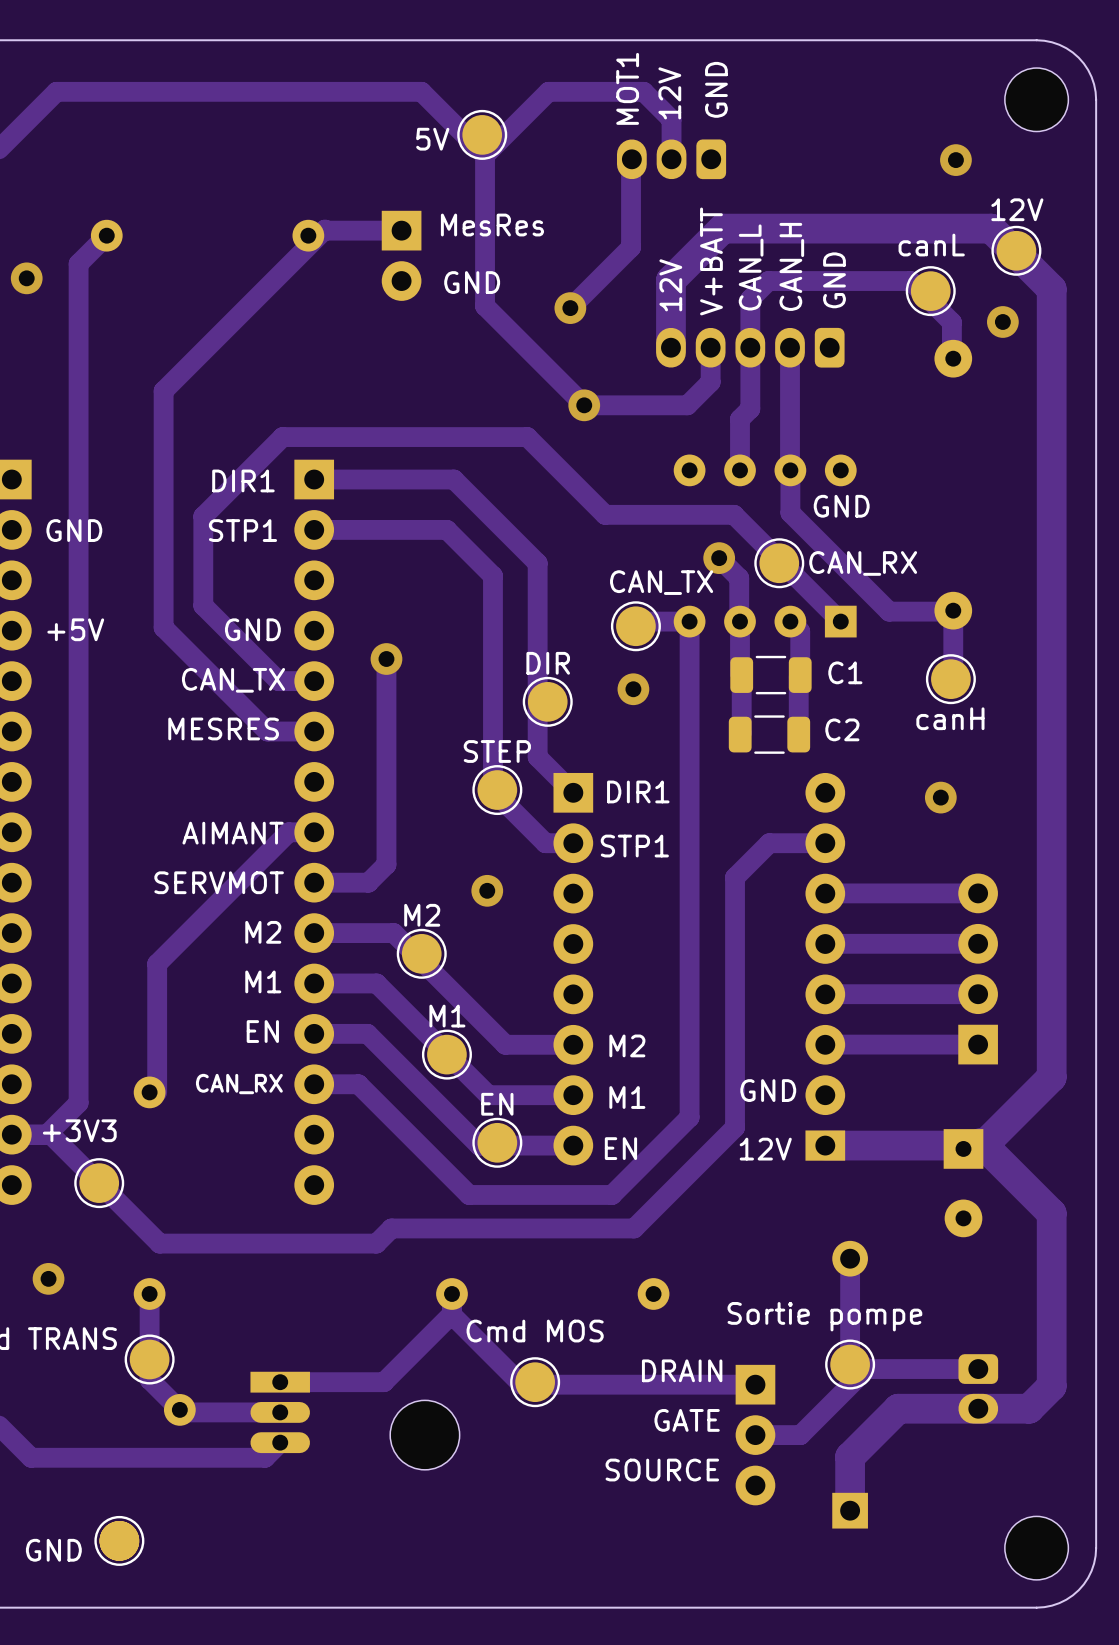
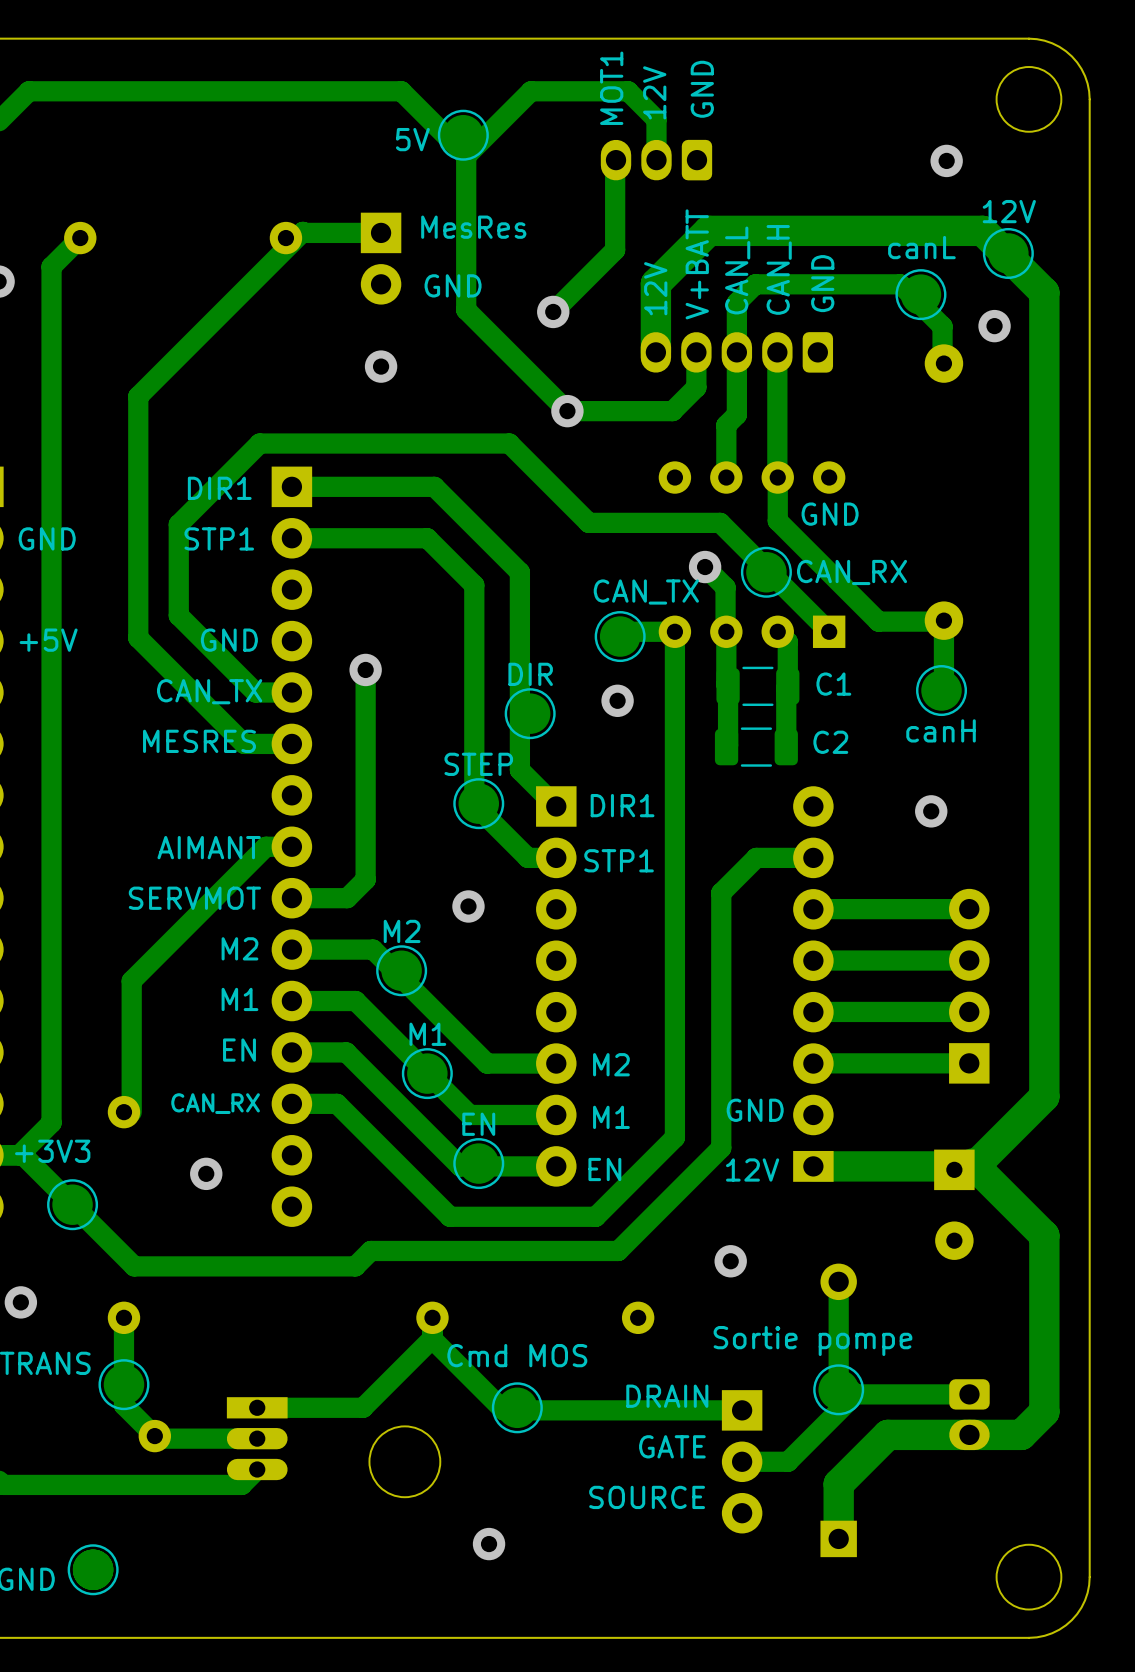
via: none -> (381, 366)
via: none -> (206, 1173)
via: none -> (730, 1261)
via: none -> (489, 1544)

